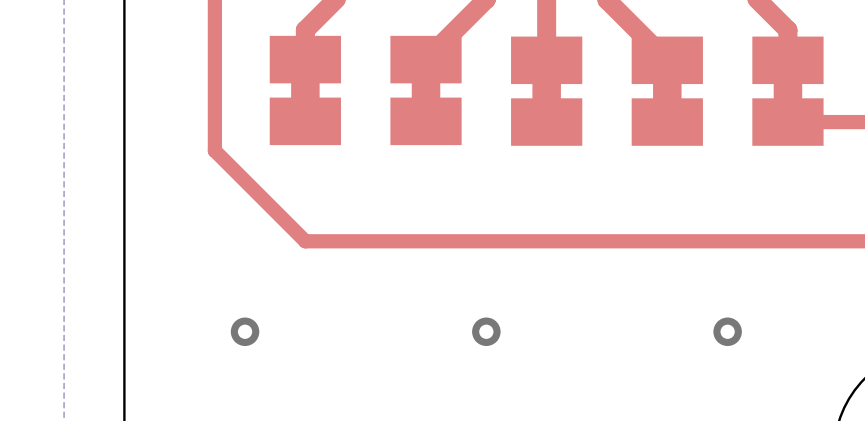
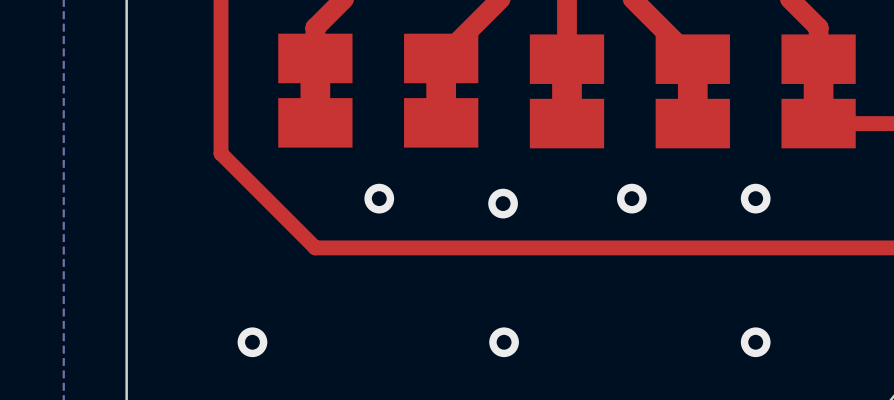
via: none -> (379, 198)
via: none -> (631, 198)
via: none -> (755, 198)
via: none -> (503, 203)

